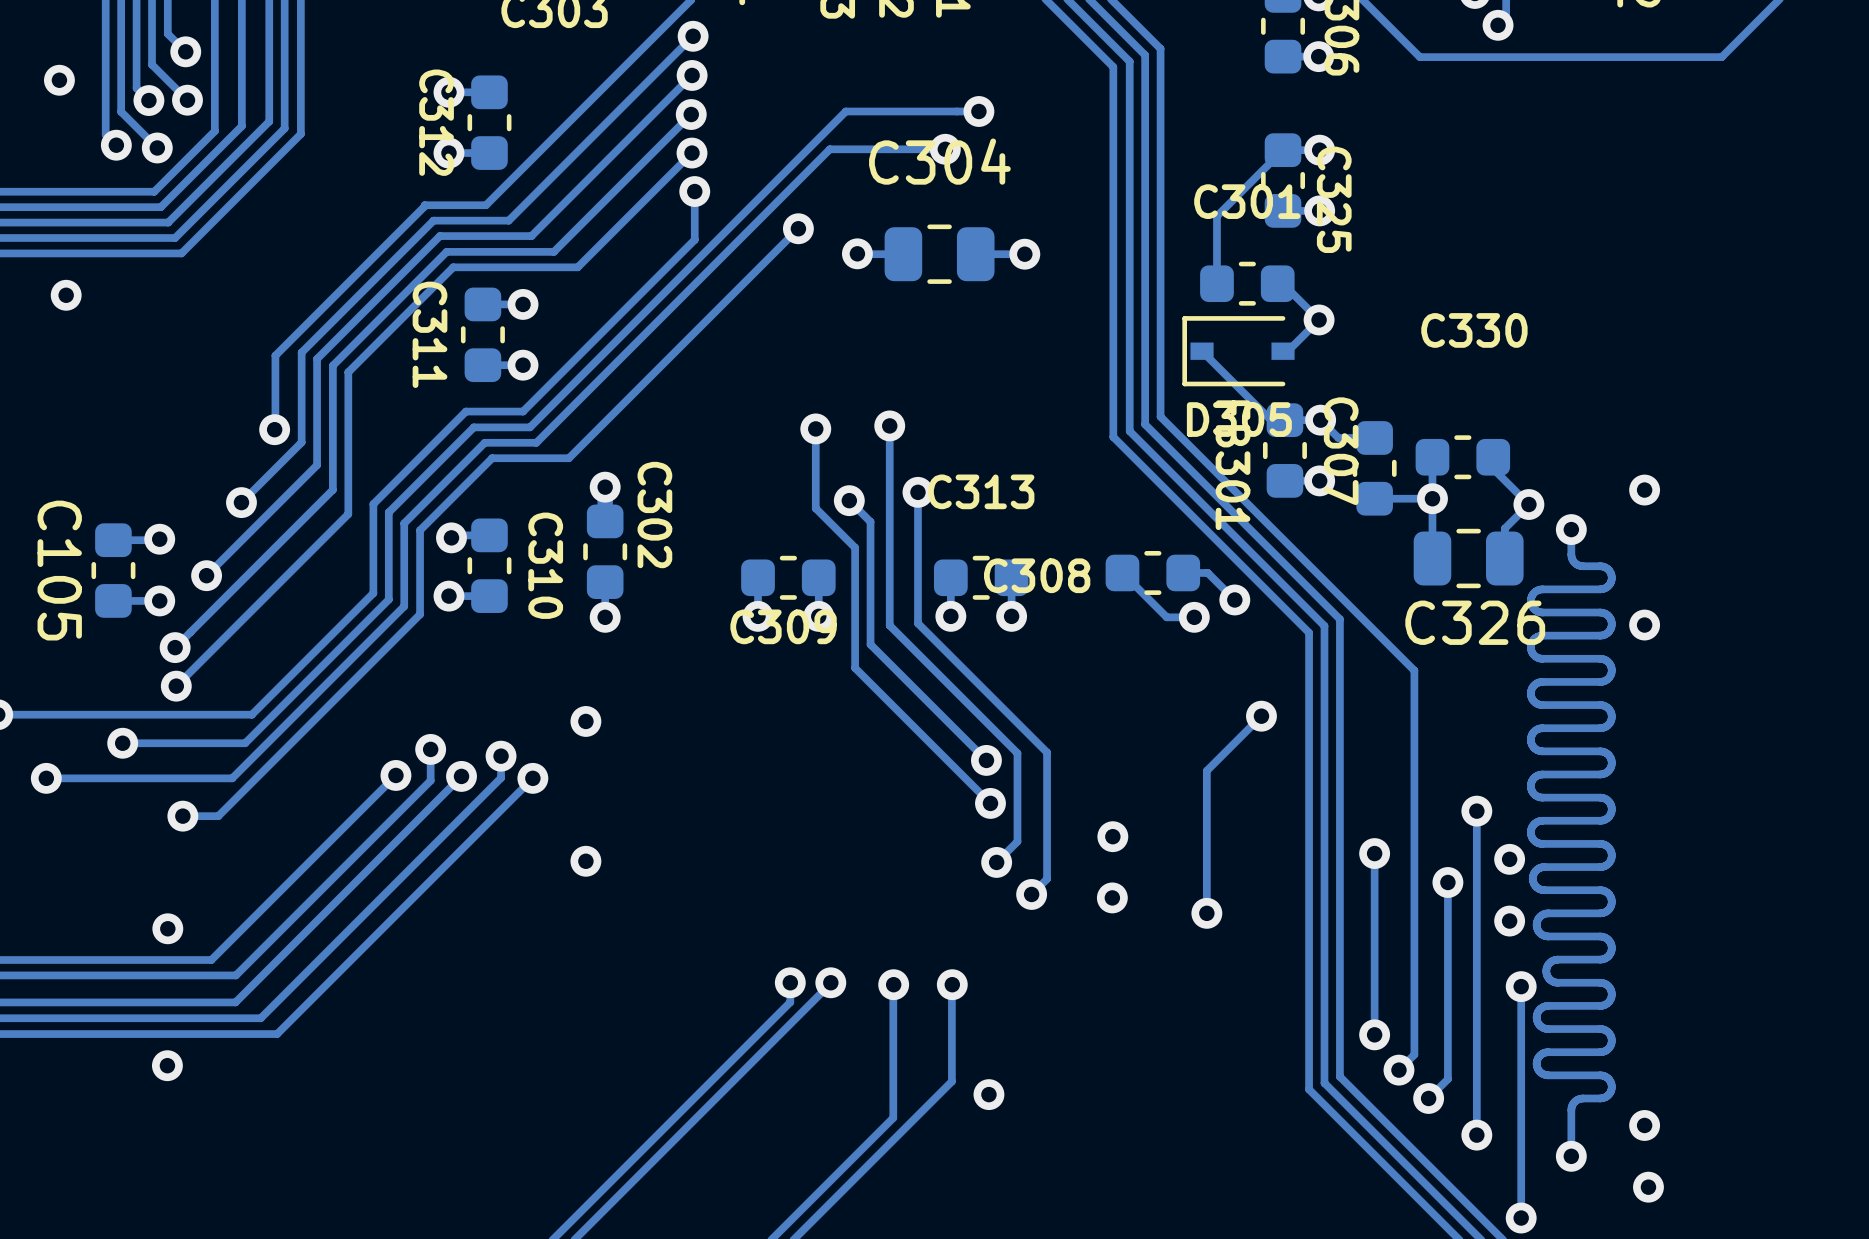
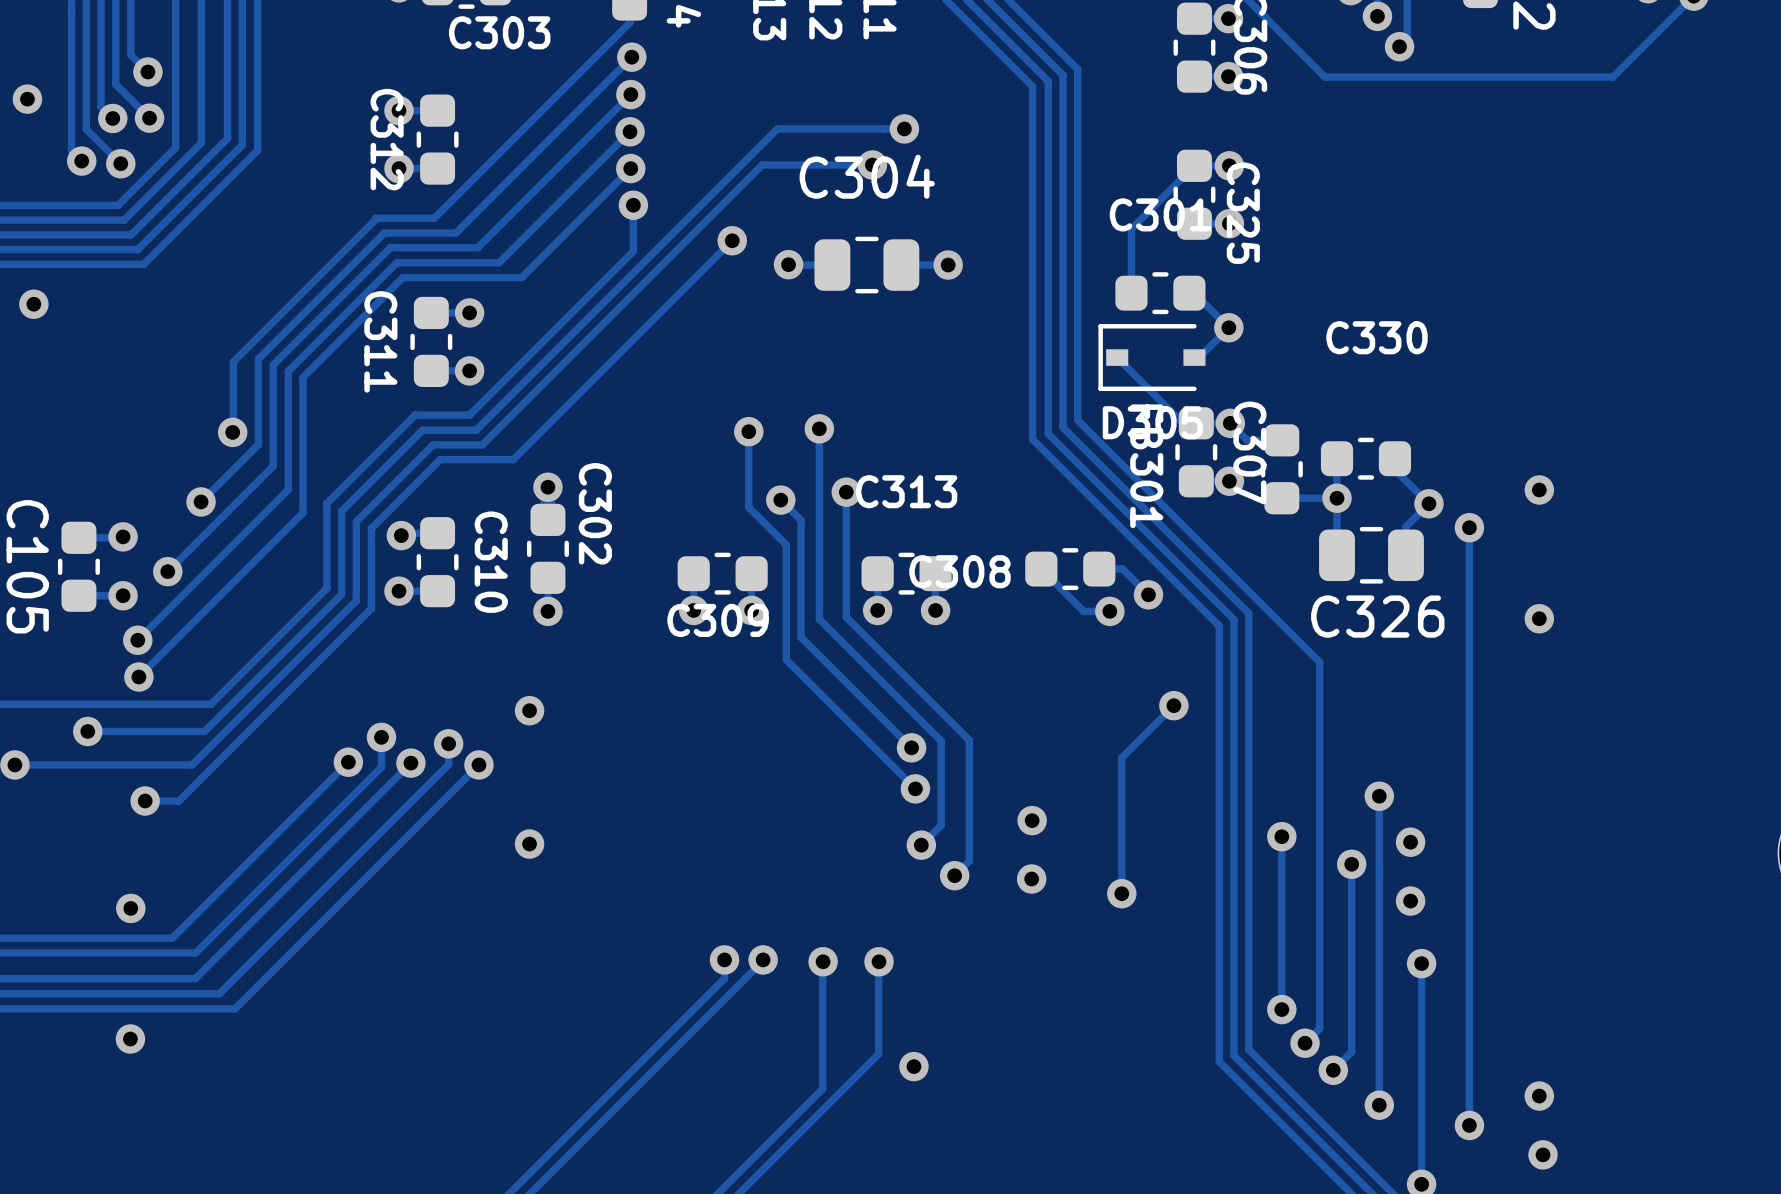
track: (1571, 554) (1572, 559) (1577, 565) (1605, 567) (1610, 572) (1611, 577) (1609, 585) (1602, 589) (1539, 589) (1533, 593) (1530, 600) (1533, 608) (1539, 612) (1602, 612) (1609, 616) (1611, 624) (1609, 631) (1602, 635) (1539, 635) (1533, 640) (1530, 647) (1533, 654) (1539, 658) (1602, 659) (1609, 663) (1611, 670) (1609, 677) (1602, 681) (1539, 682) (1533, 686) (1530, 693) (1533, 700) (1539, 704) (1602, 705) (1609, 709) (1611, 716) (1609, 723) (1602, 727) (1539, 728) (1533, 732) (1530, 739) (1533, 746) (1539, 751) (1602, 751) (1609, 755) (1611, 762) (1609, 770) (1602, 774) (1539, 774) (1533, 778) (1531, 783) (1531, 791) (1539, 797) (1602, 797) (1607, 800) (1611, 806) (1610, 814) (1602, 820) (1539, 821) (1533, 825) (1531, 829) (1531, 837) (1539, 843) (1602, 844) (1609, 848) (1611, 852) (1610, 860) (1602, 866) (1541, 867) (1537, 869) (1533, 876) (1533, 883) (1541, 889) (1602, 890) (1607, 892) (1611, 899) (1610, 906) (1602, 913) (1545, 913) (1540, 915) (1536, 922) (1537, 929) (1545, 936) (1602, 936) (1607, 939) (1611, 945) (1610, 953) (1605, 958) (1555, 959) (1548, 963) (1546, 968) (1547, 976) (1552, 981) (1602, 983) (1607, 985) (1611, 991) (1610, 999) (1602, 1005) (1545, 1006) (1540, 1008) (1536, 1014) (1537, 1022) (1545, 1028) (1600, 1029) (1605, 1030) (1610, 1035) (1610, 1045) (1602, 1051) (1548, 1052) (1543, 1053) (1537, 1058) (1537, 1068) (1545, 1075) (1600, 1075) (1609, 1079) (1611, 1089) (1607, 1095) (1602, 1098) (1577, 1099) (1572, 1105) (1571, 1110) -> (1469, 551) (1469, 1081)

